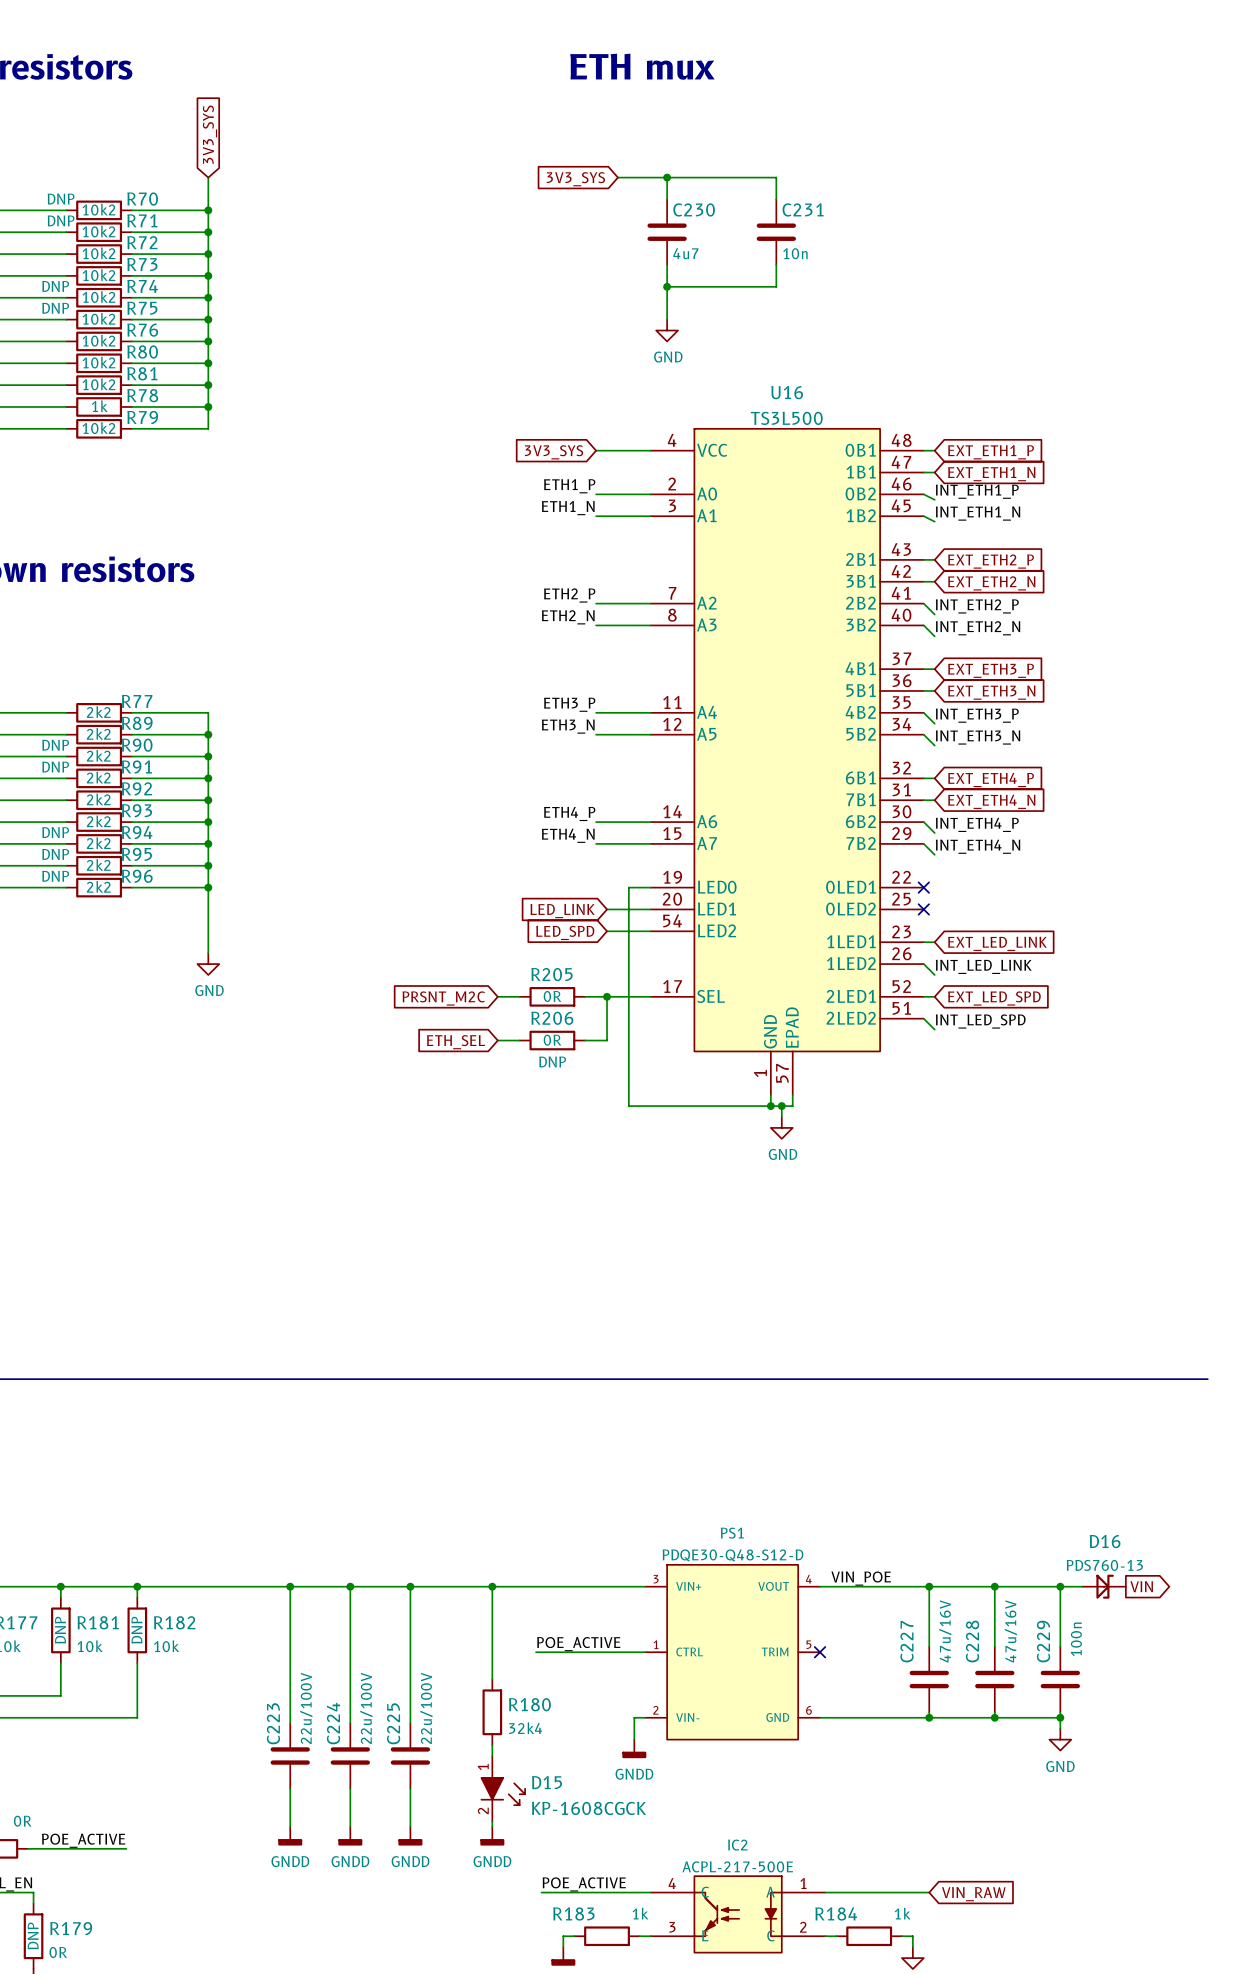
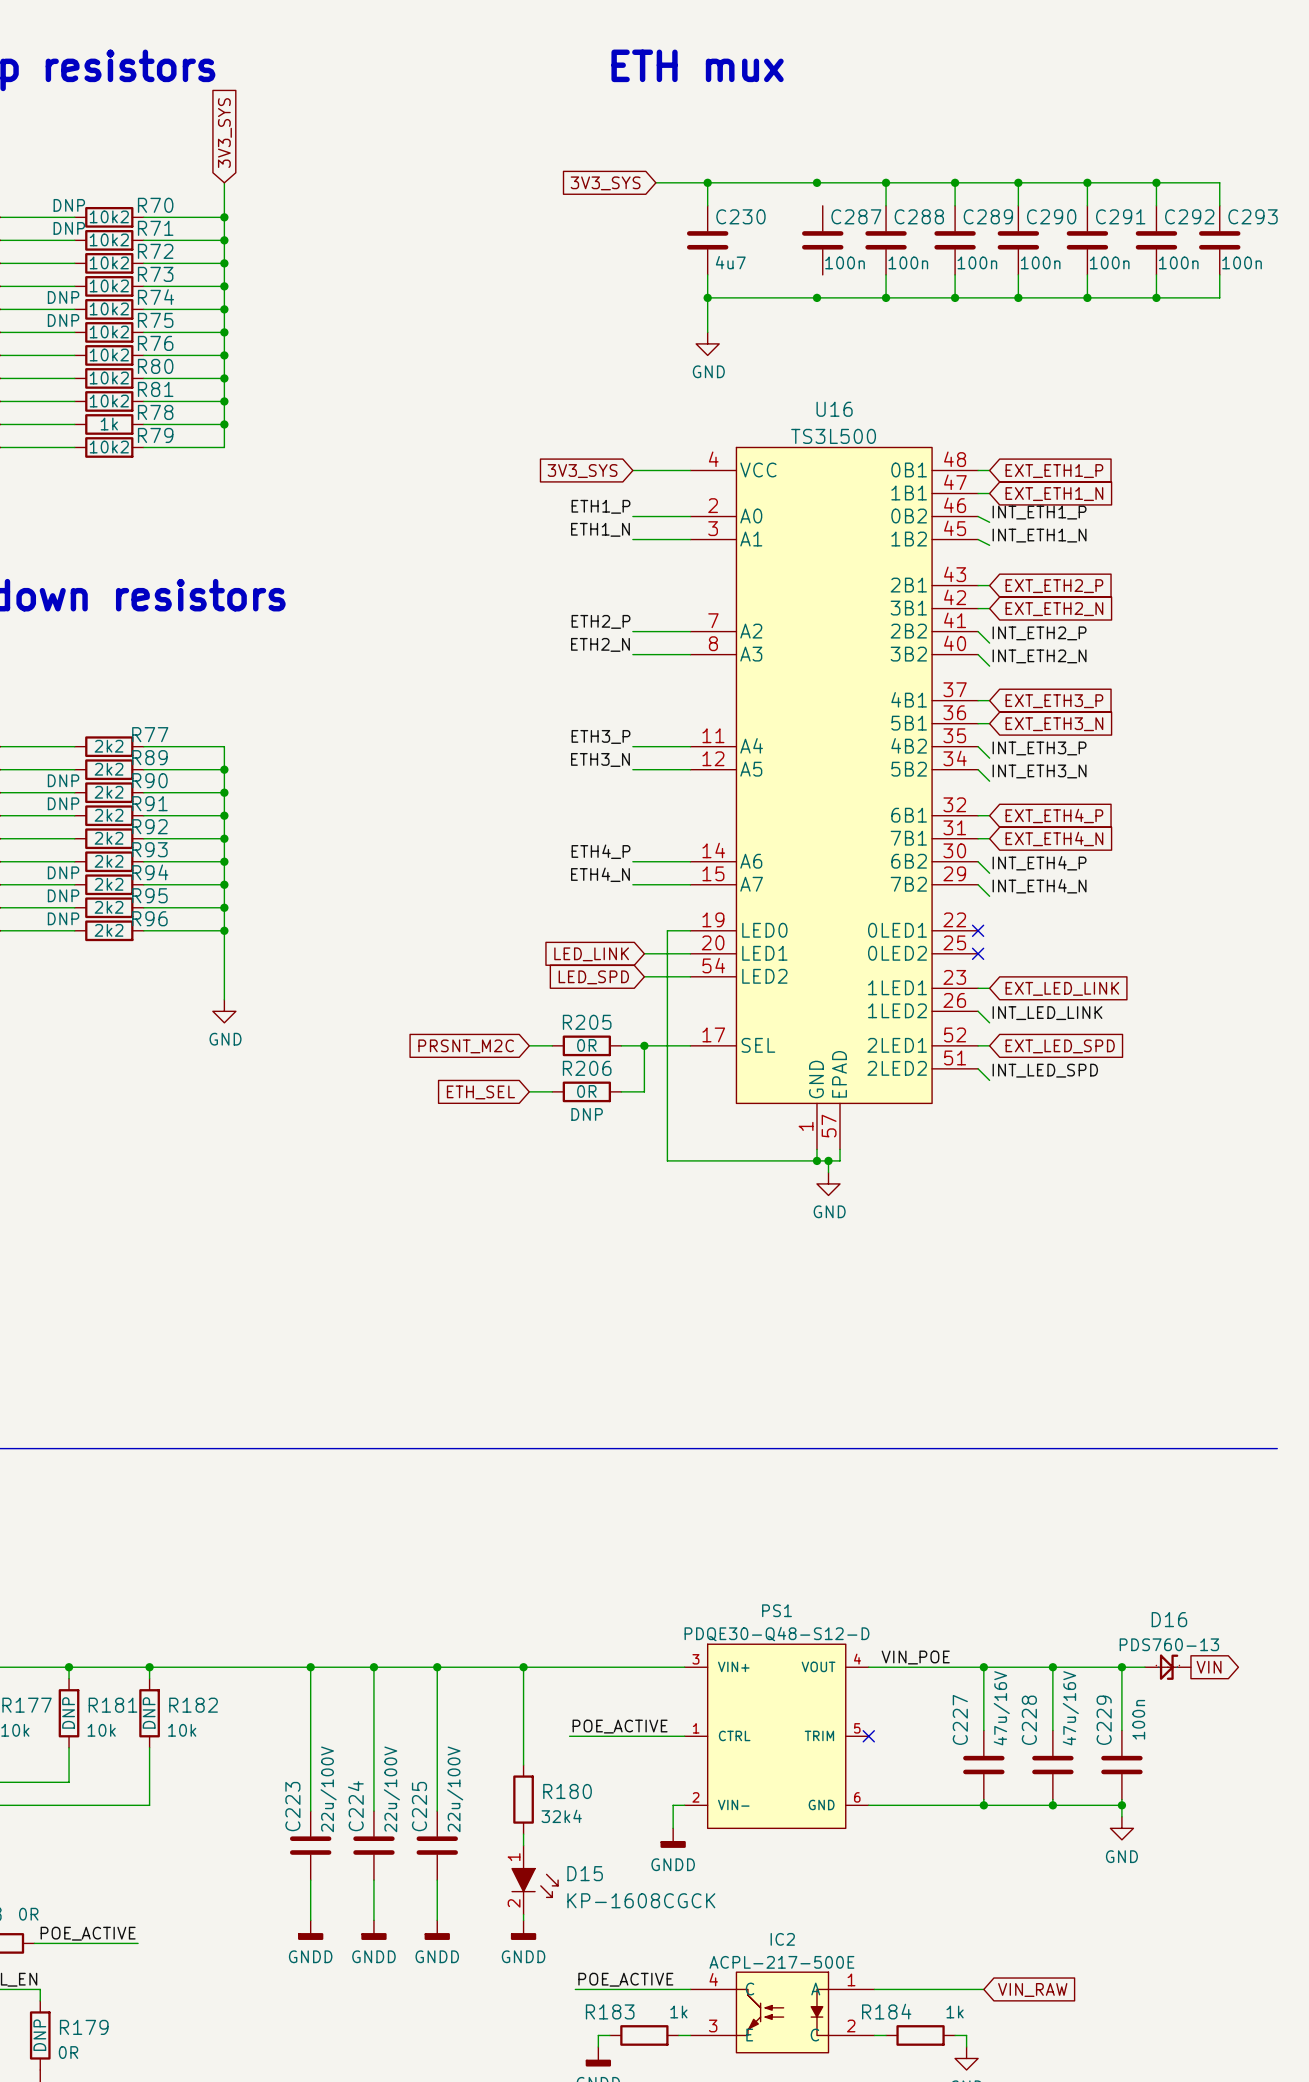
junction: none -> (816, 182)
wire: (776, 177) (776, 199) -> (822, 182) (1219, 182) (1219, 205)
wire: none -> (886, 182) (886, 205)
junction: none -> (886, 182)
wire: none -> (955, 182) (955, 205)
junction: none -> (955, 182)
wire: none -> (1018, 182) (1018, 205)
junction: none -> (1018, 182)
wire: none -> (1087, 182) (1087, 205)
junction: none -> (1087, 182)
wire: none -> (1156, 182) (1156, 205)
junction: none -> (1156, 182)
C231 name: C231 (803, 209) -> C287 (856, 216)
C288: none -> (886, 240)
C289: none -> (955, 240)
C290: none -> (1018, 240)
C291: none -> (1087, 240)
C292: none -> (1156, 240)
C293: none -> (1219, 240)
C231 text: 10n (795, 253) -> 100n (845, 262)
wire: (776, 264) (776, 286) -> (1219, 274) (1219, 297) (822, 297)
wire: none -> (886, 274) (886, 297)
wire: none -> (955, 274) (955, 297)
wire: none -> (1018, 274) (1018, 297)
wire: none -> (1087, 274) (1087, 297)
wire: none -> (1156, 274) (1156, 297)
junction: none -> (816, 297)
junction: none -> (886, 297)
junction: none -> (955, 297)
junction: none -> (1018, 297)
junction: none -> (1087, 297)
junction: none -> (1156, 297)

